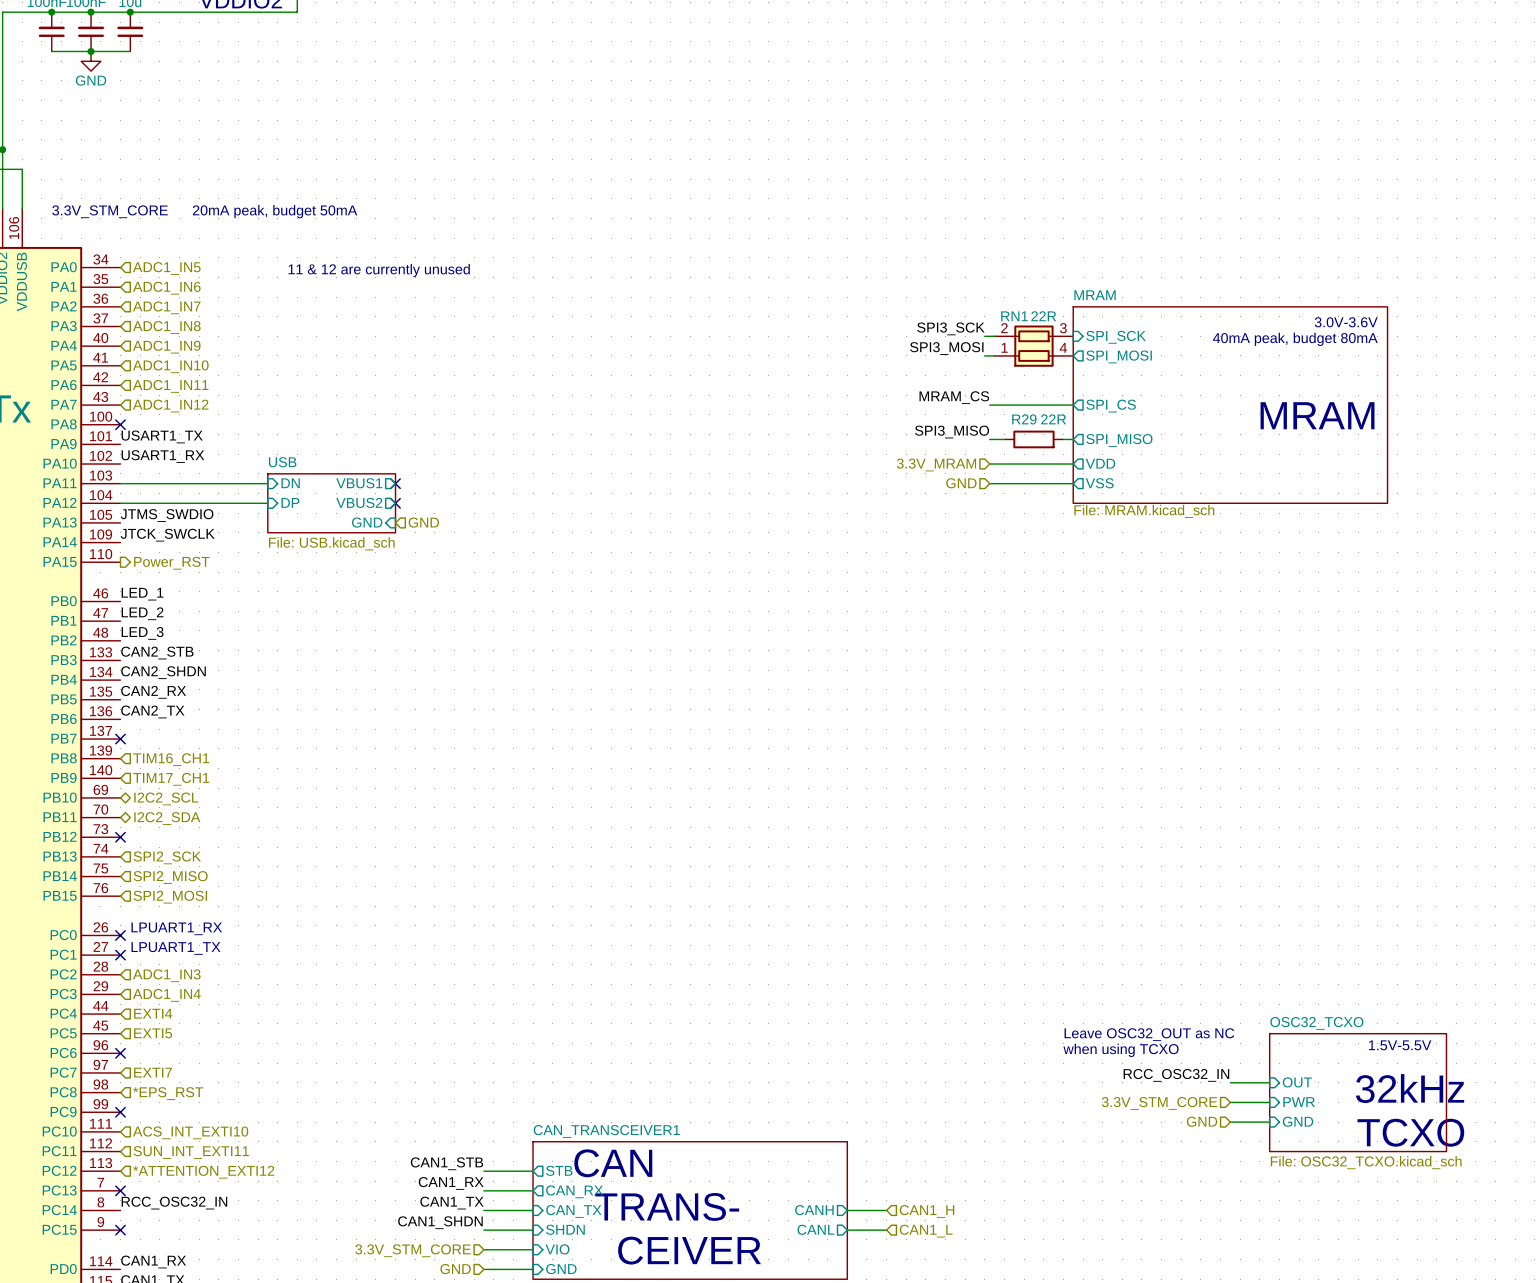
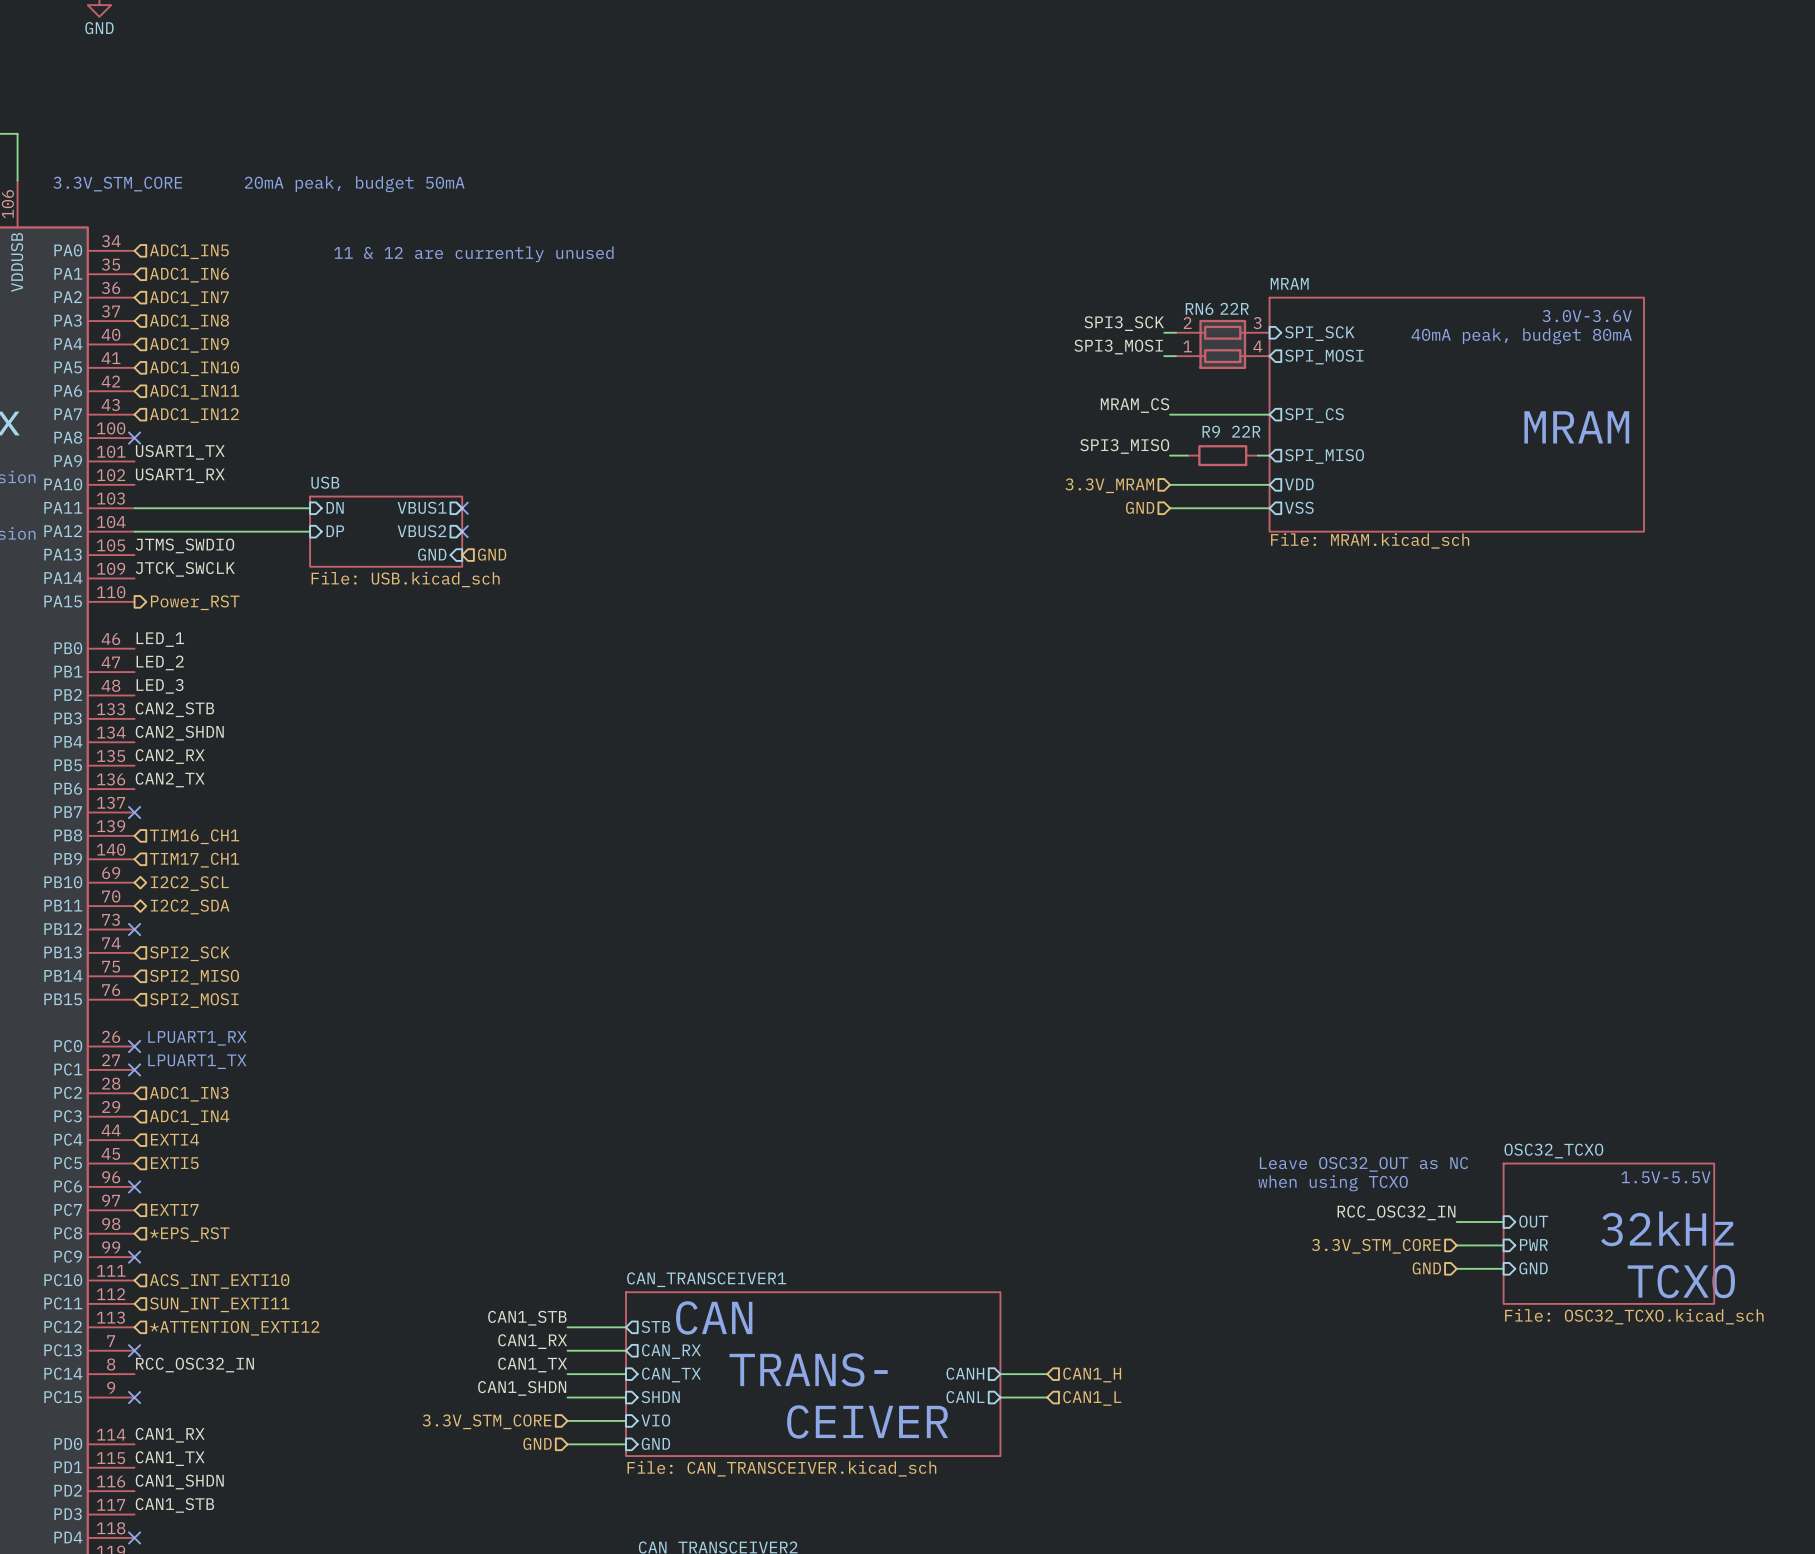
RN1 name: RN1 (1014, 316) -> RN6 (1199, 309)
R29 name: R29 (1024, 419) -> R9 (1211, 431)

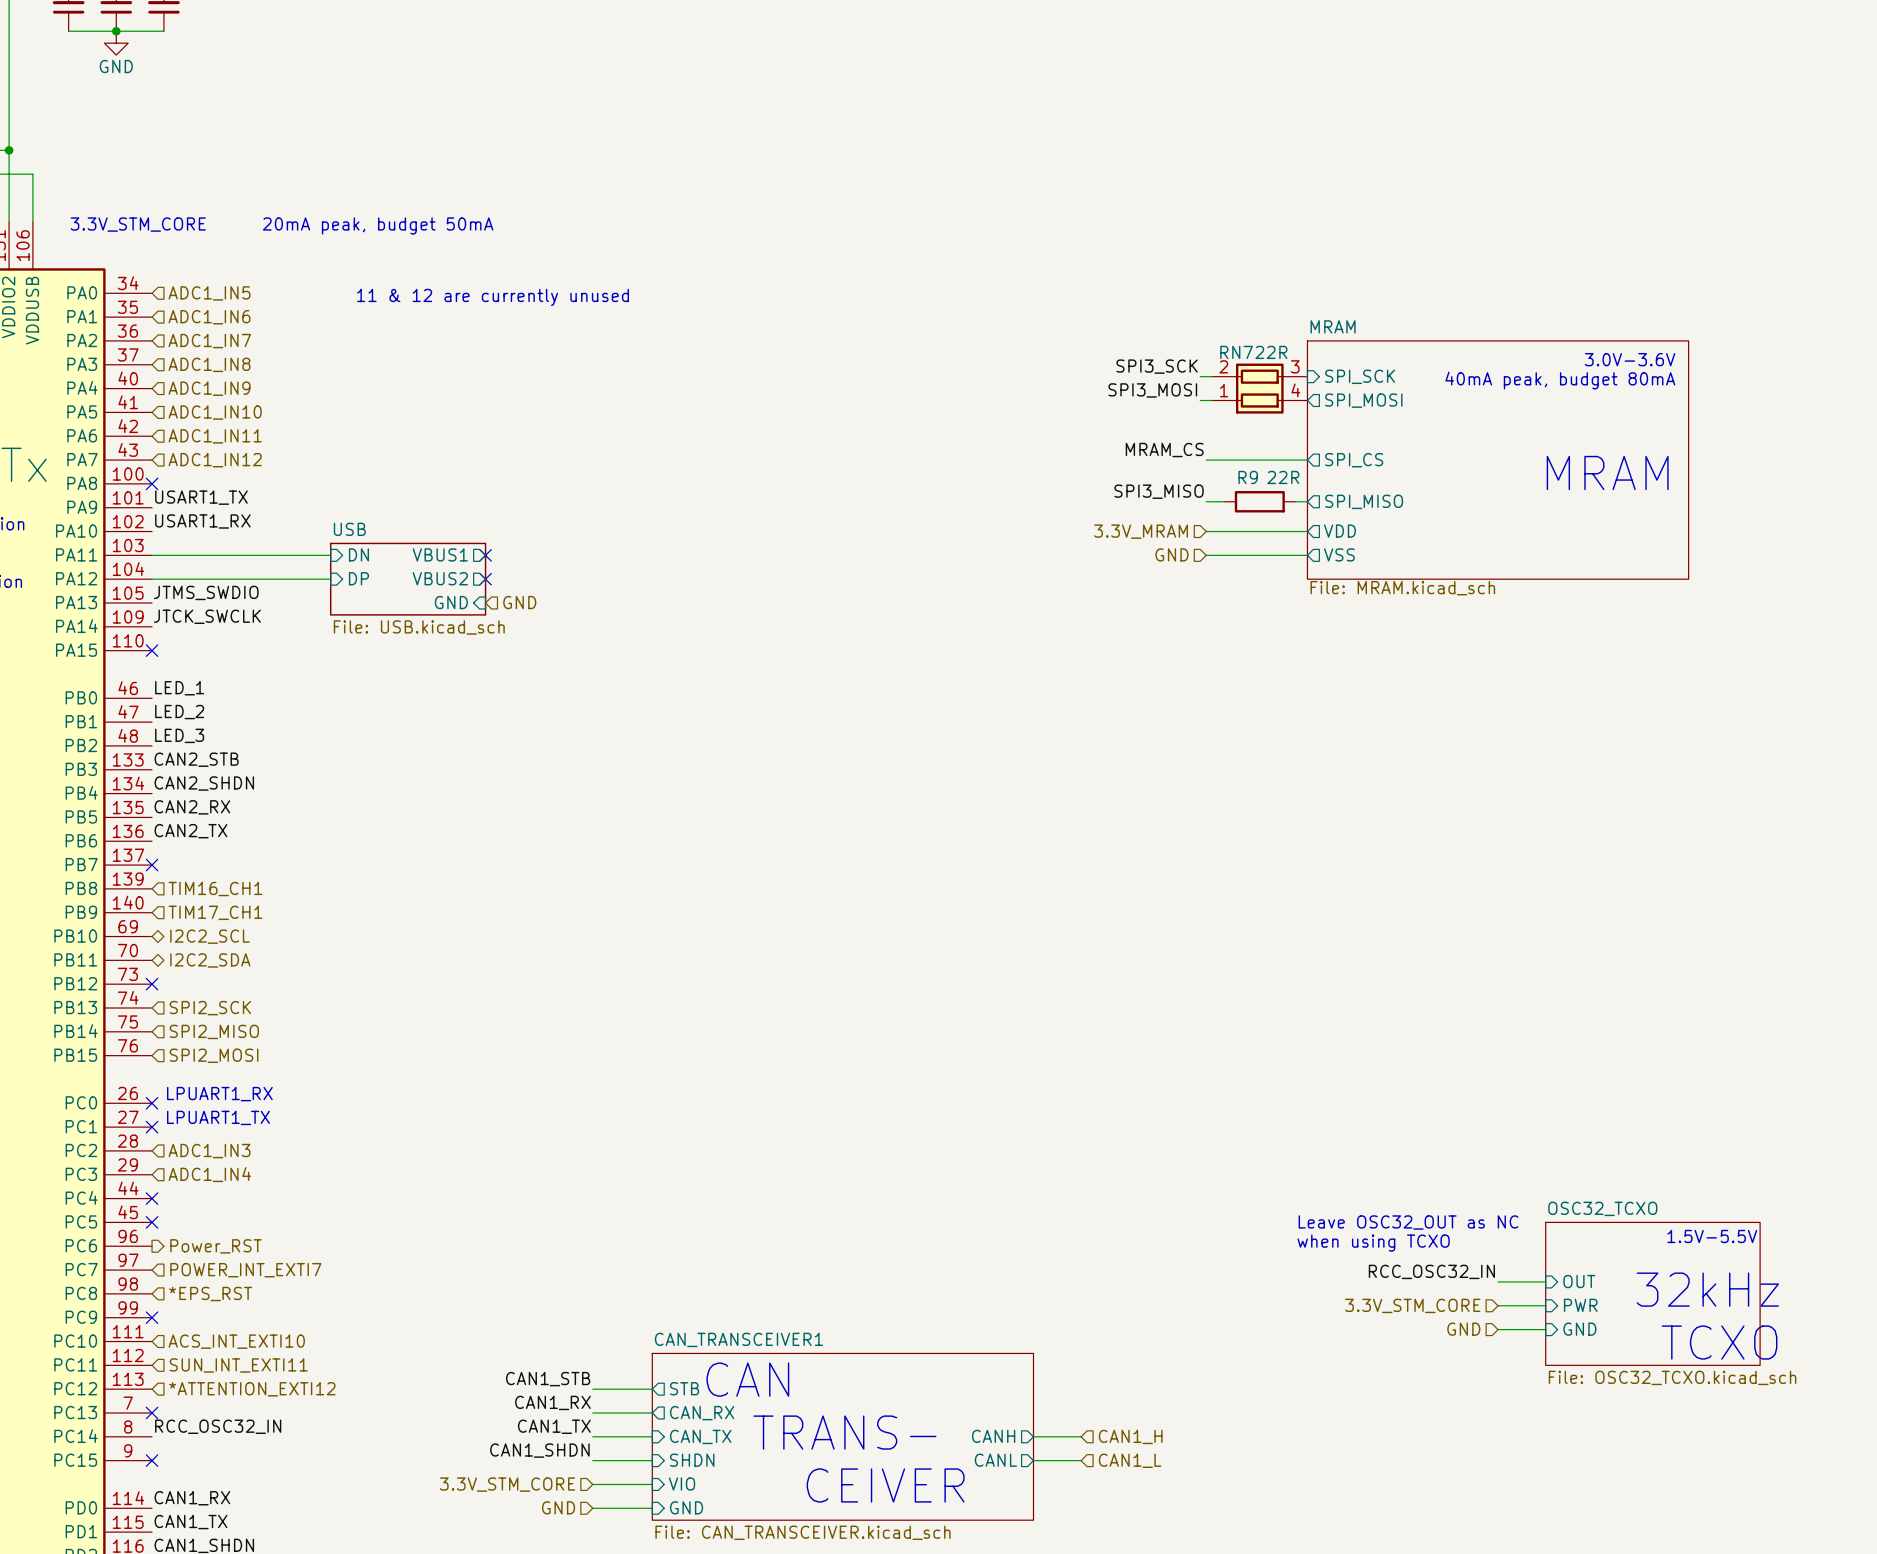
RN6 name: RN6 (1199, 309) -> RN7 (1236, 352)
no-connect mark: none -> (152, 650)
hierarchical label: Power_RST (195, 602) -> none
hierarchical label: EXTI4 (175, 1139) -> none
no-connect mark: none -> (152, 1198)
no-connect mark: none -> (152, 1222)
hierarchical label: EXTI5 (174, 1163) -> none
no-connect mark: (134, 1186) -> none
hierarchical label: none -> Power_RST (216, 1246)
hierarchical label: EXTI7 (174, 1209) -> POWER_INT_EXTI7 (245, 1270)

